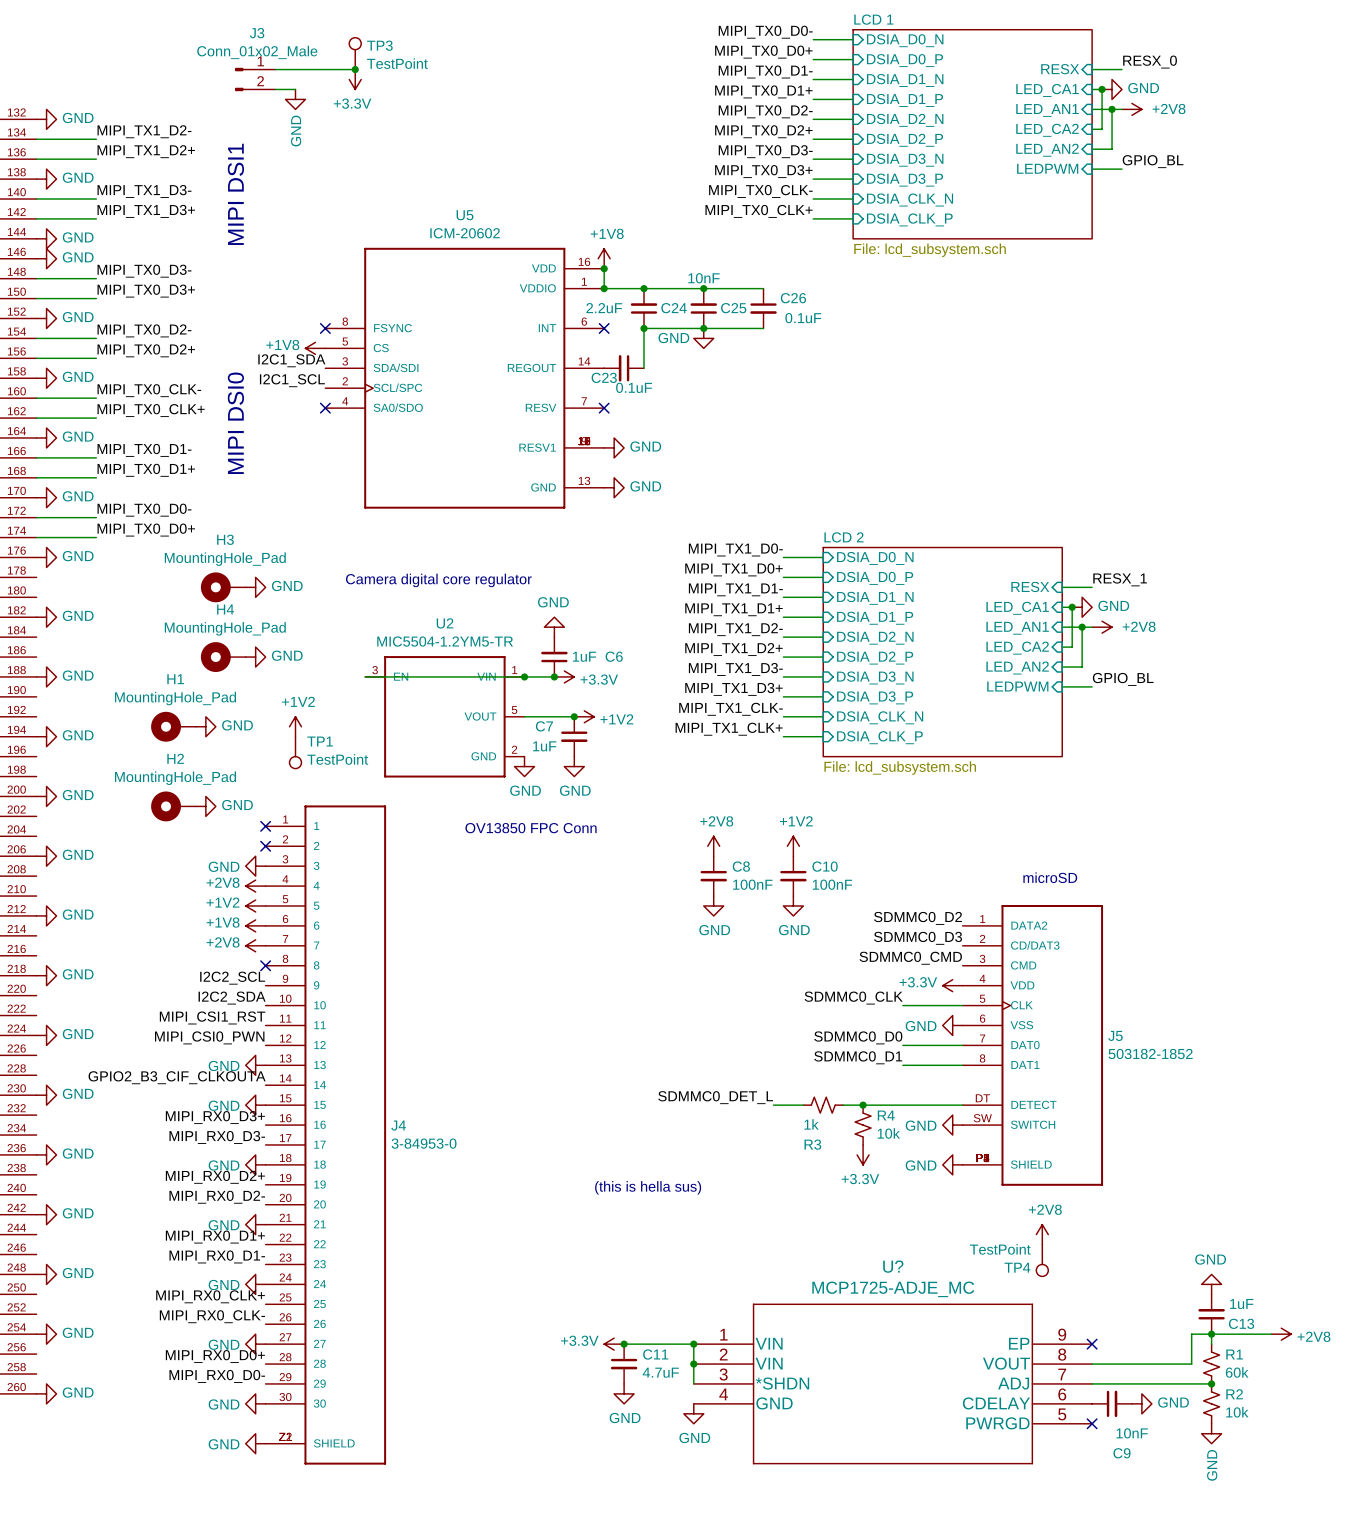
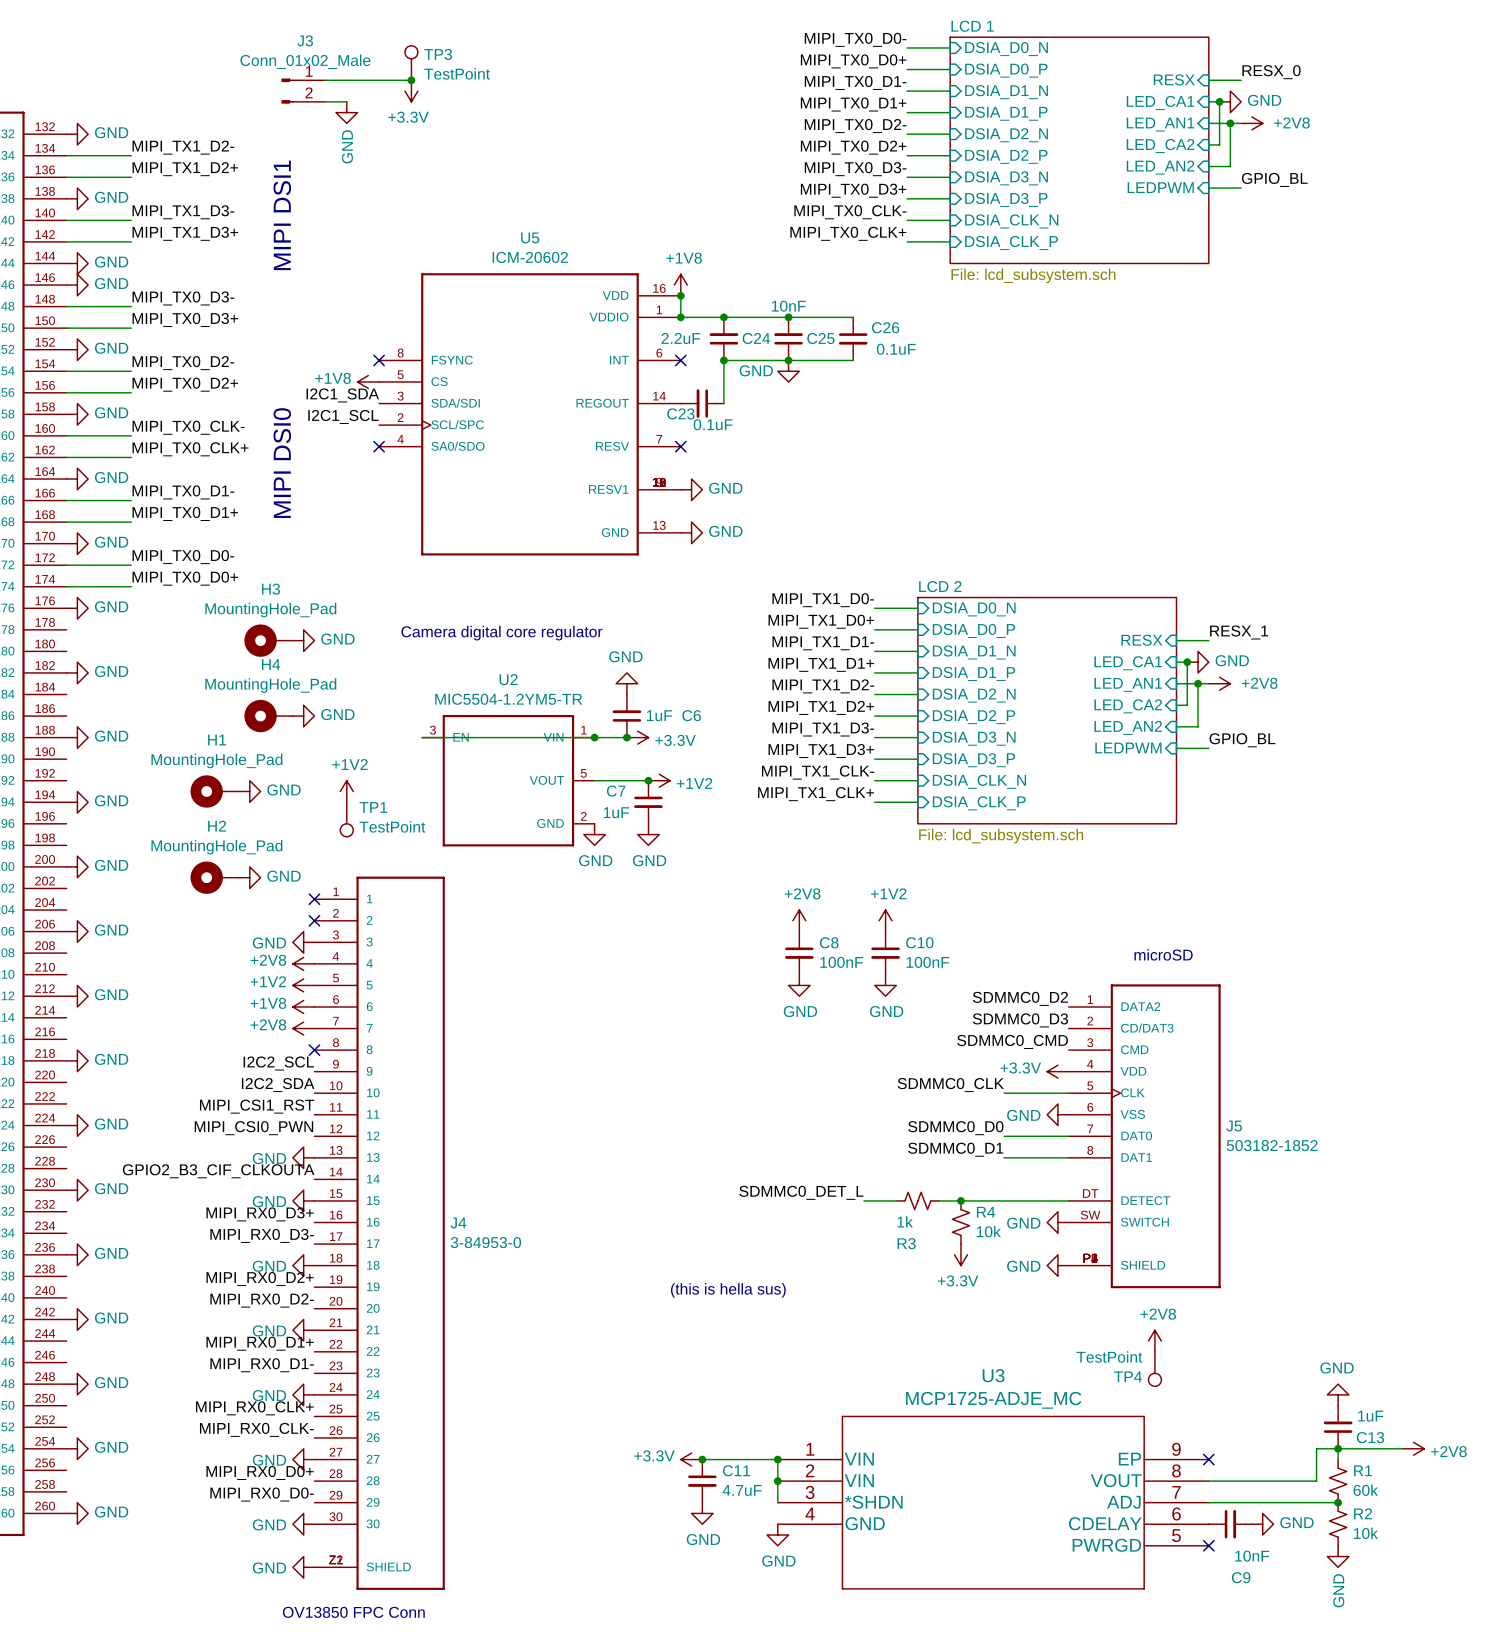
text: OV13850 FPC Conn (531, 828) -> none
U? name: U? (893, 1266) -> U3 (993, 1375)
text: none -> OV13850 FPC Conn (353, 1612)

